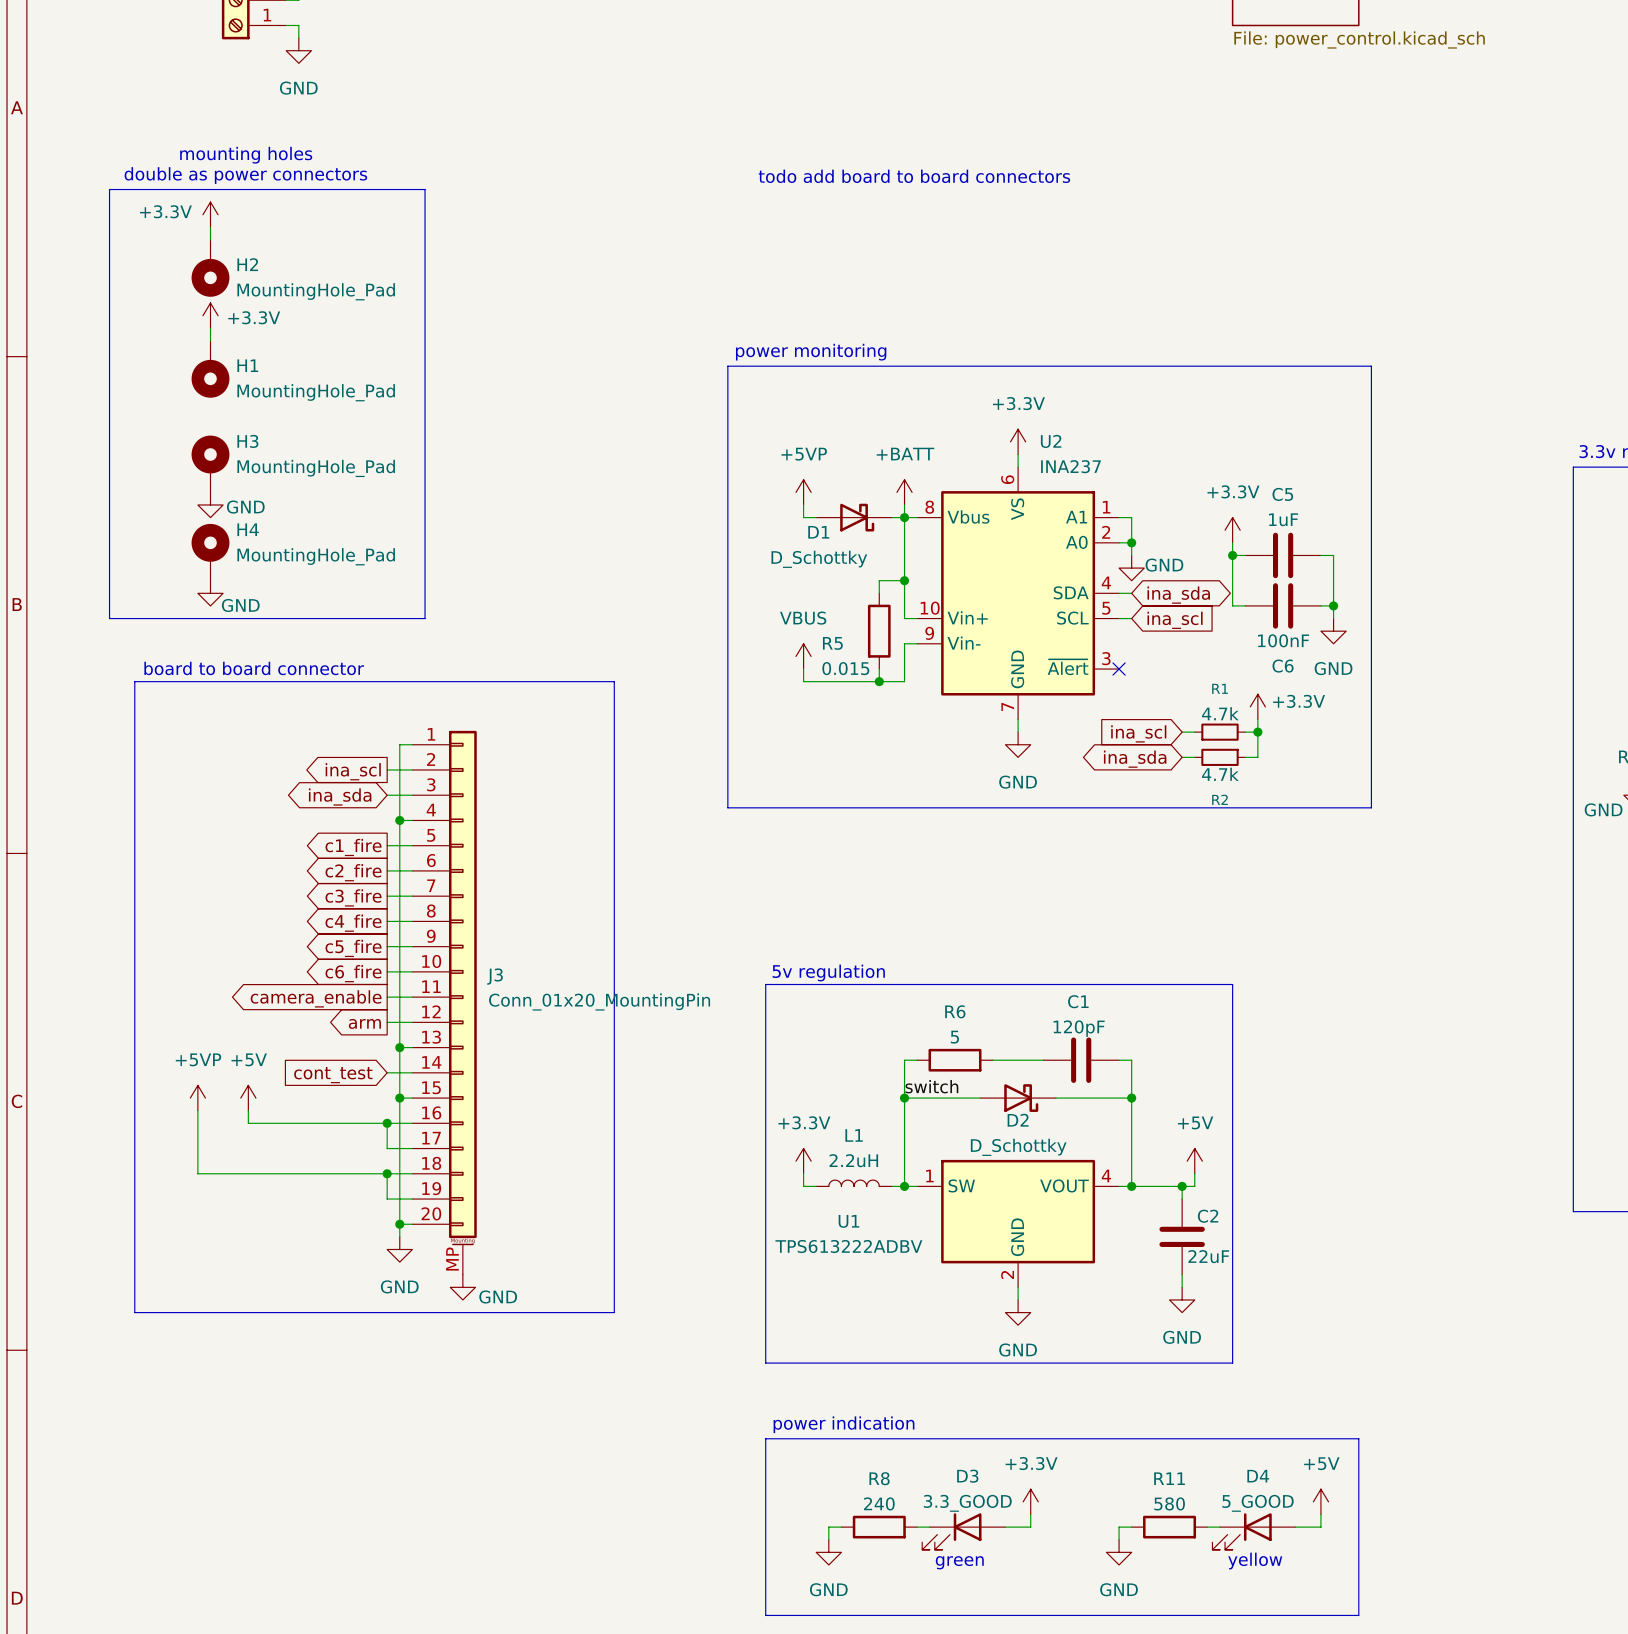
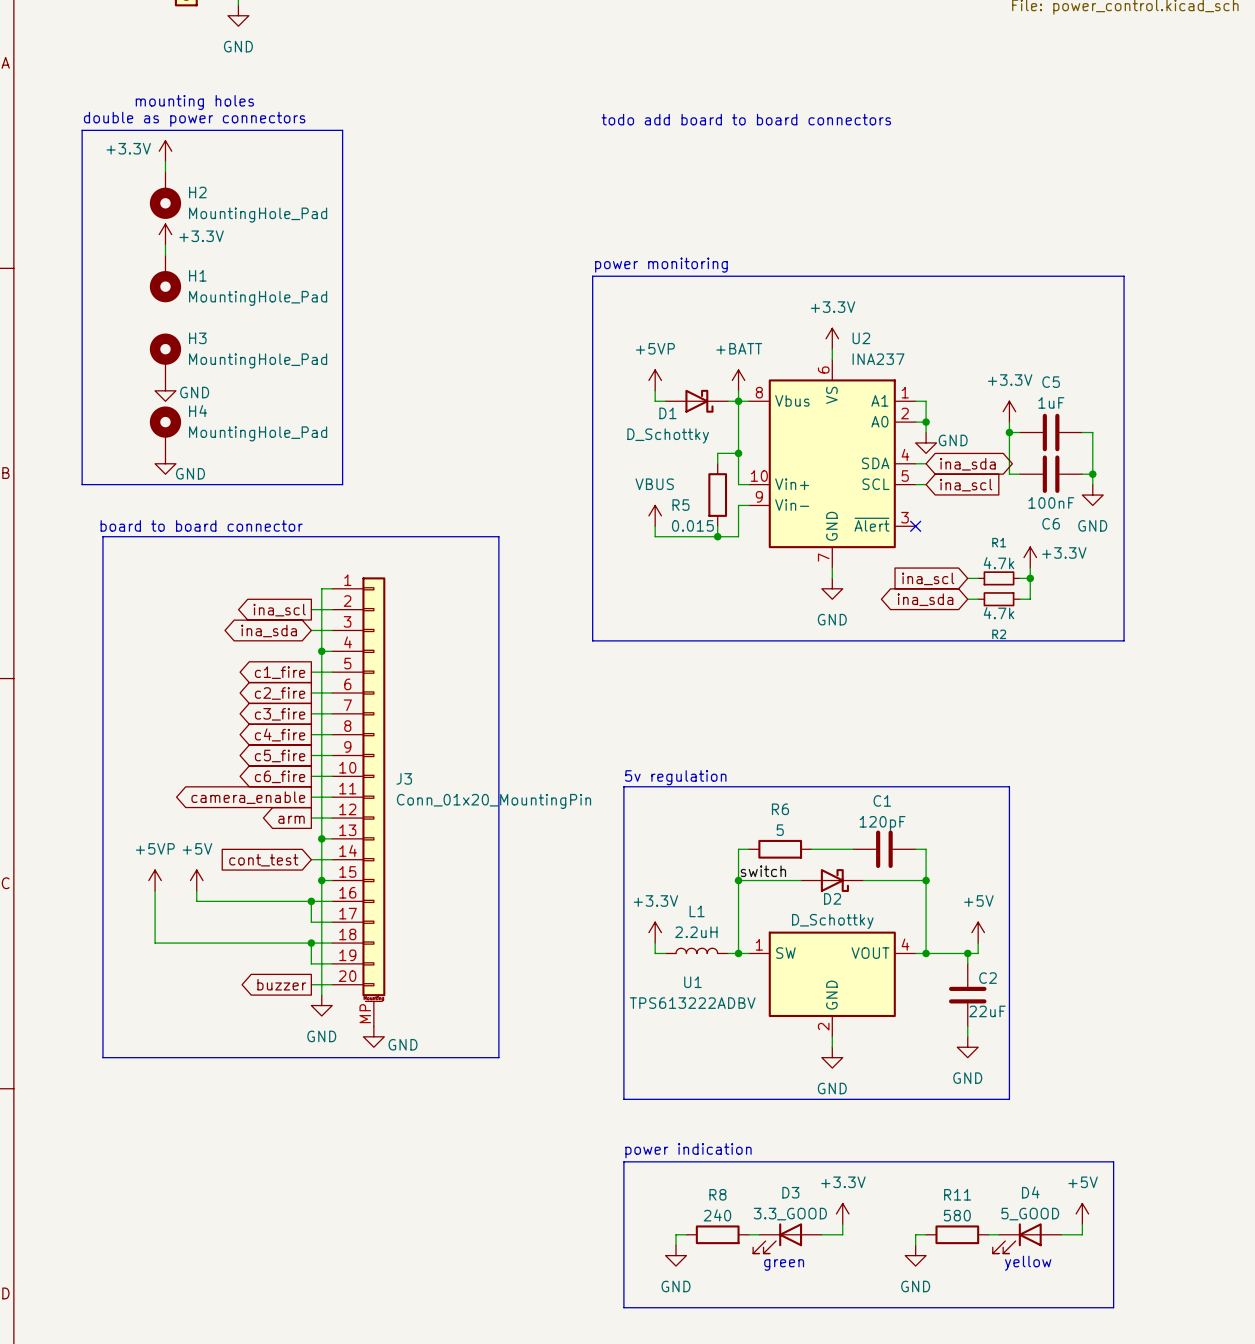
global label: none -> buzzer (281, 984)
wire: none -> (311, 984) (321, 984)
junction: (399, 1224) -> none

